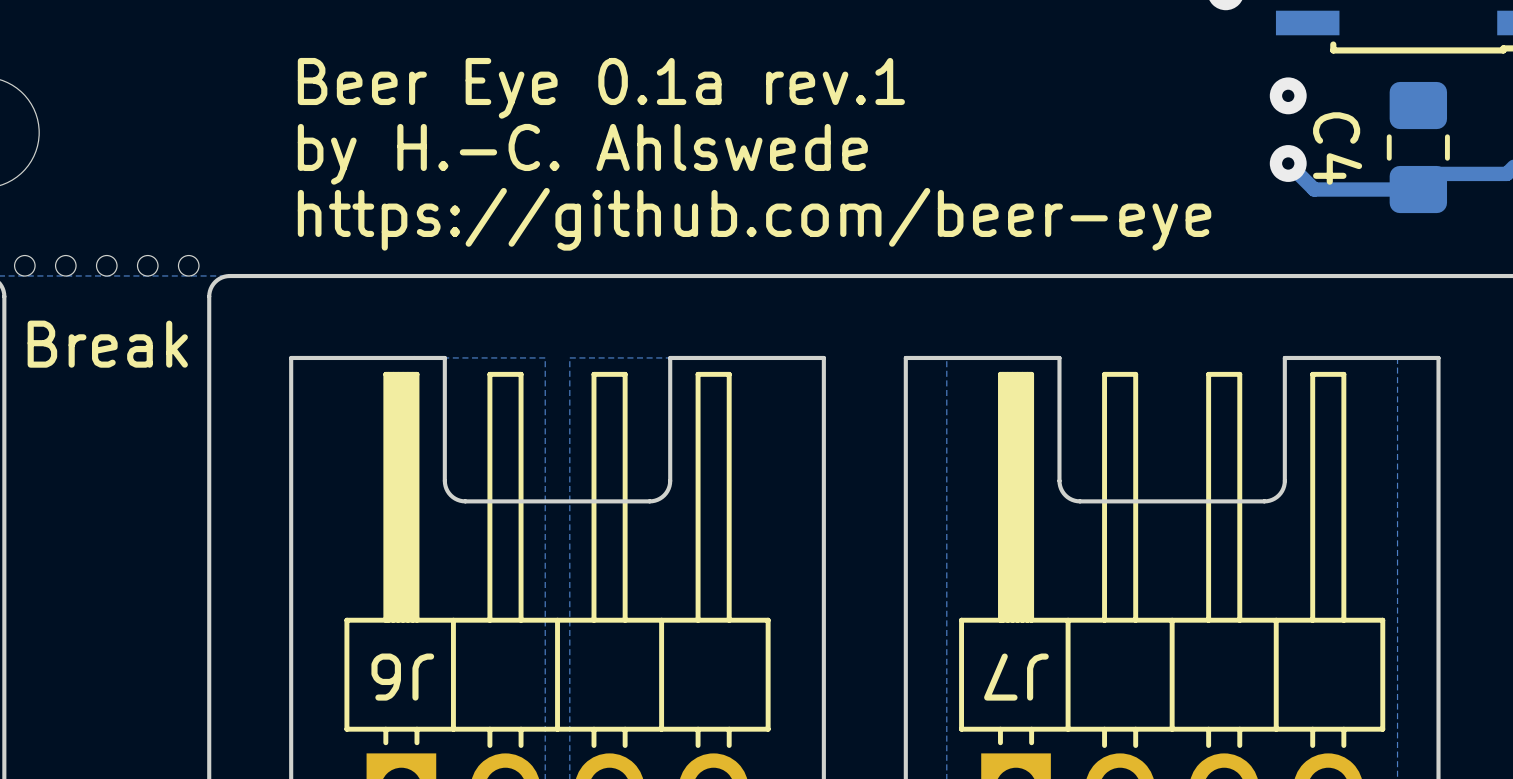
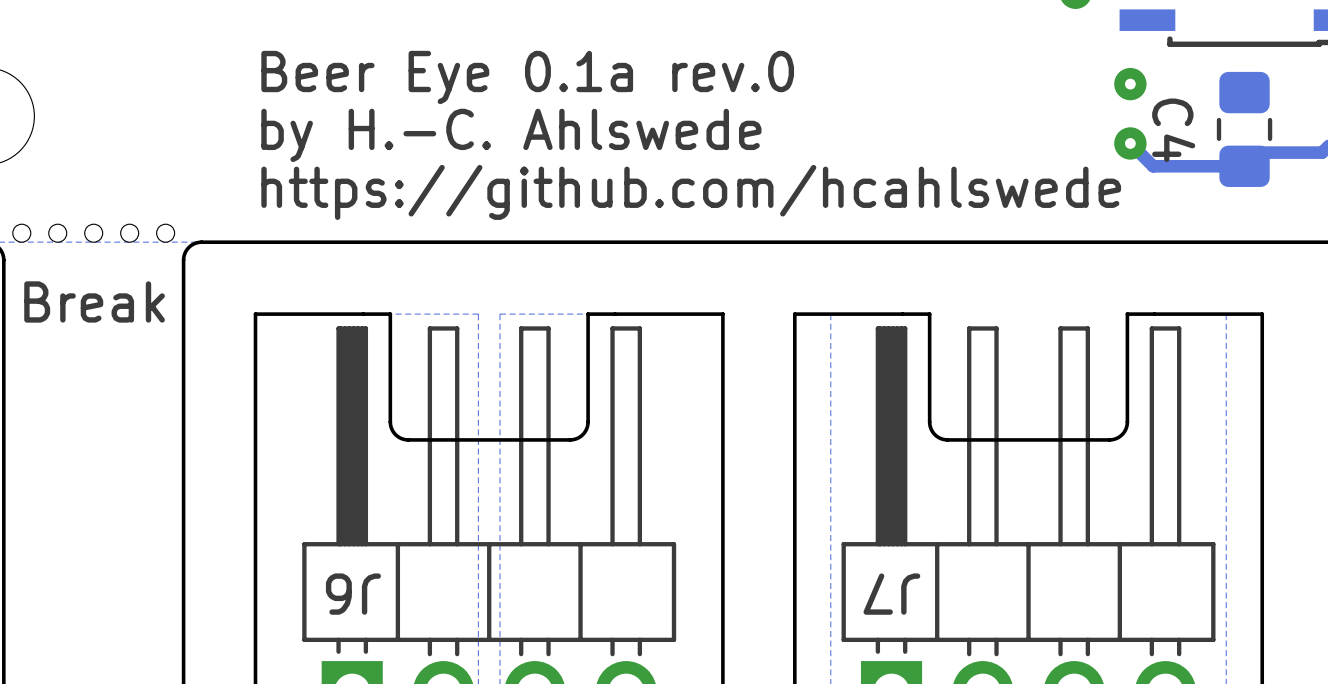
text: Beer Eye 0.1a rev.1 (601, 88) -> Beer Eye 0.1a rev.0 (527, 77)
text: https://github.com/beer-eye (754, 219) -> https://github.com/hcahlswede (691, 192)

